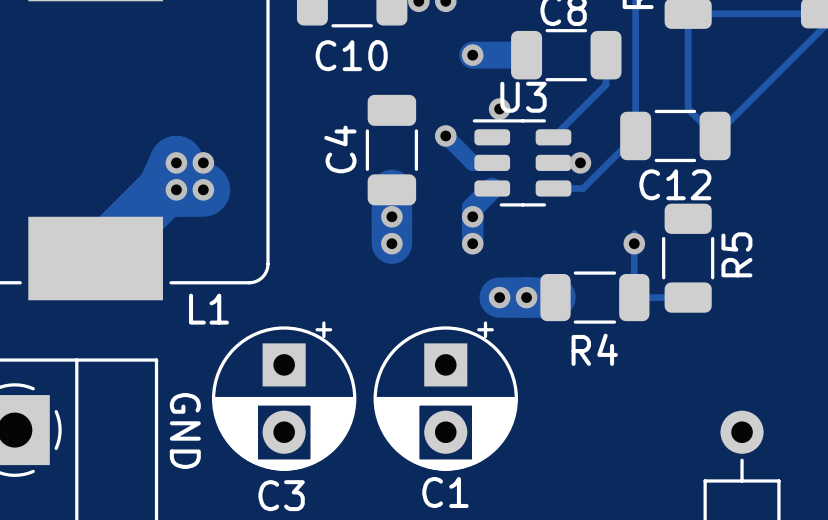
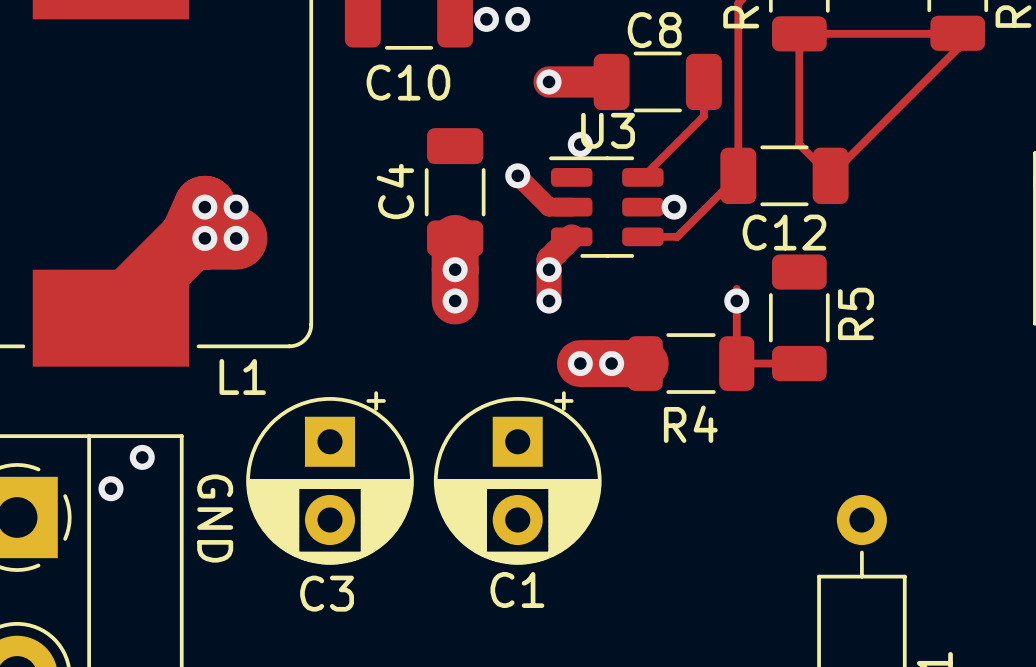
via: none -> (142, 457)
via: none -> (110, 488)

